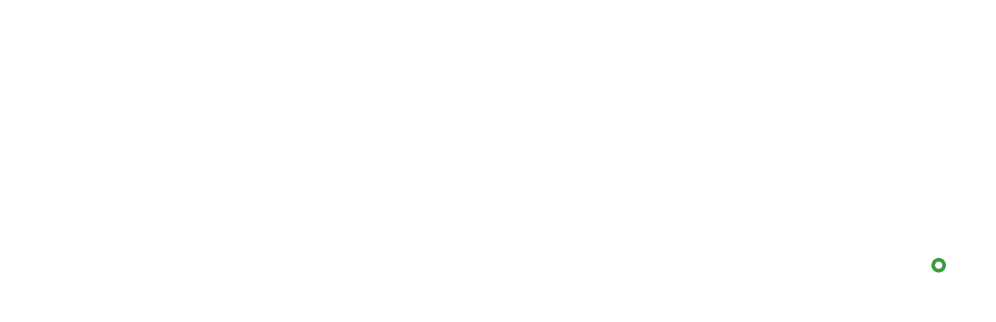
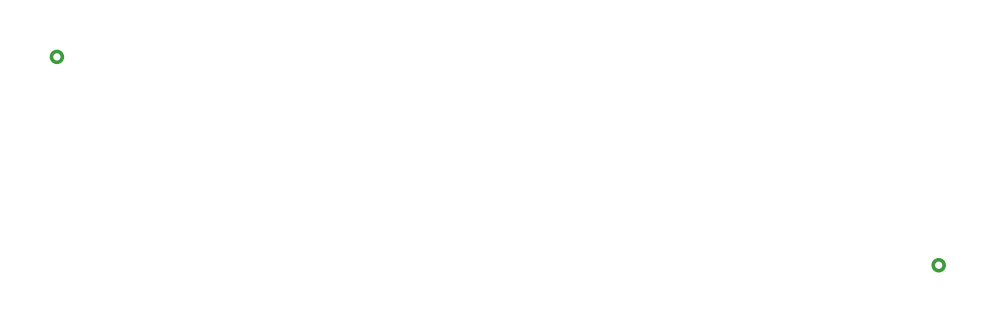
via: none -> (56, 56)

